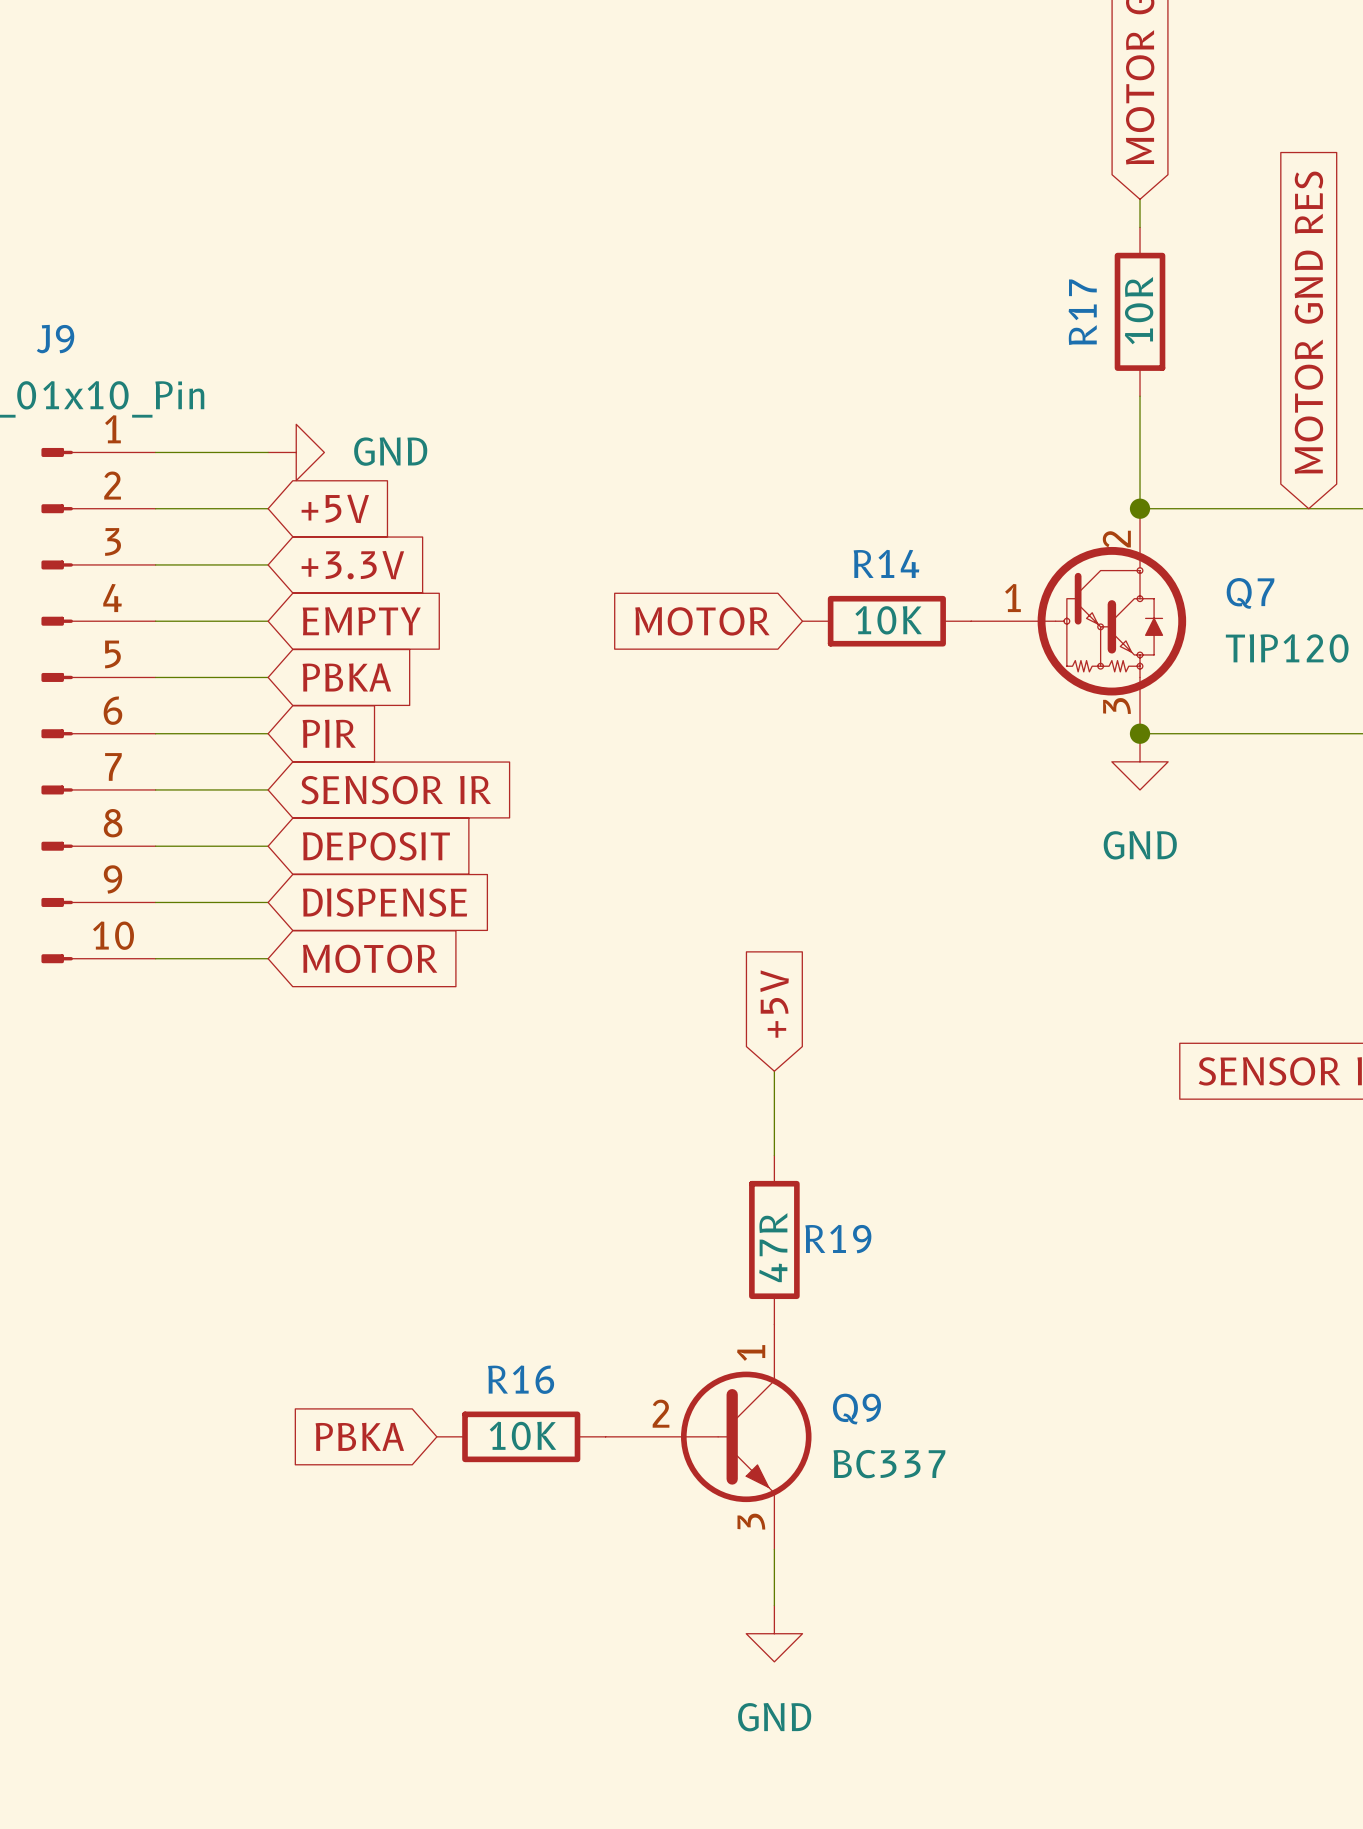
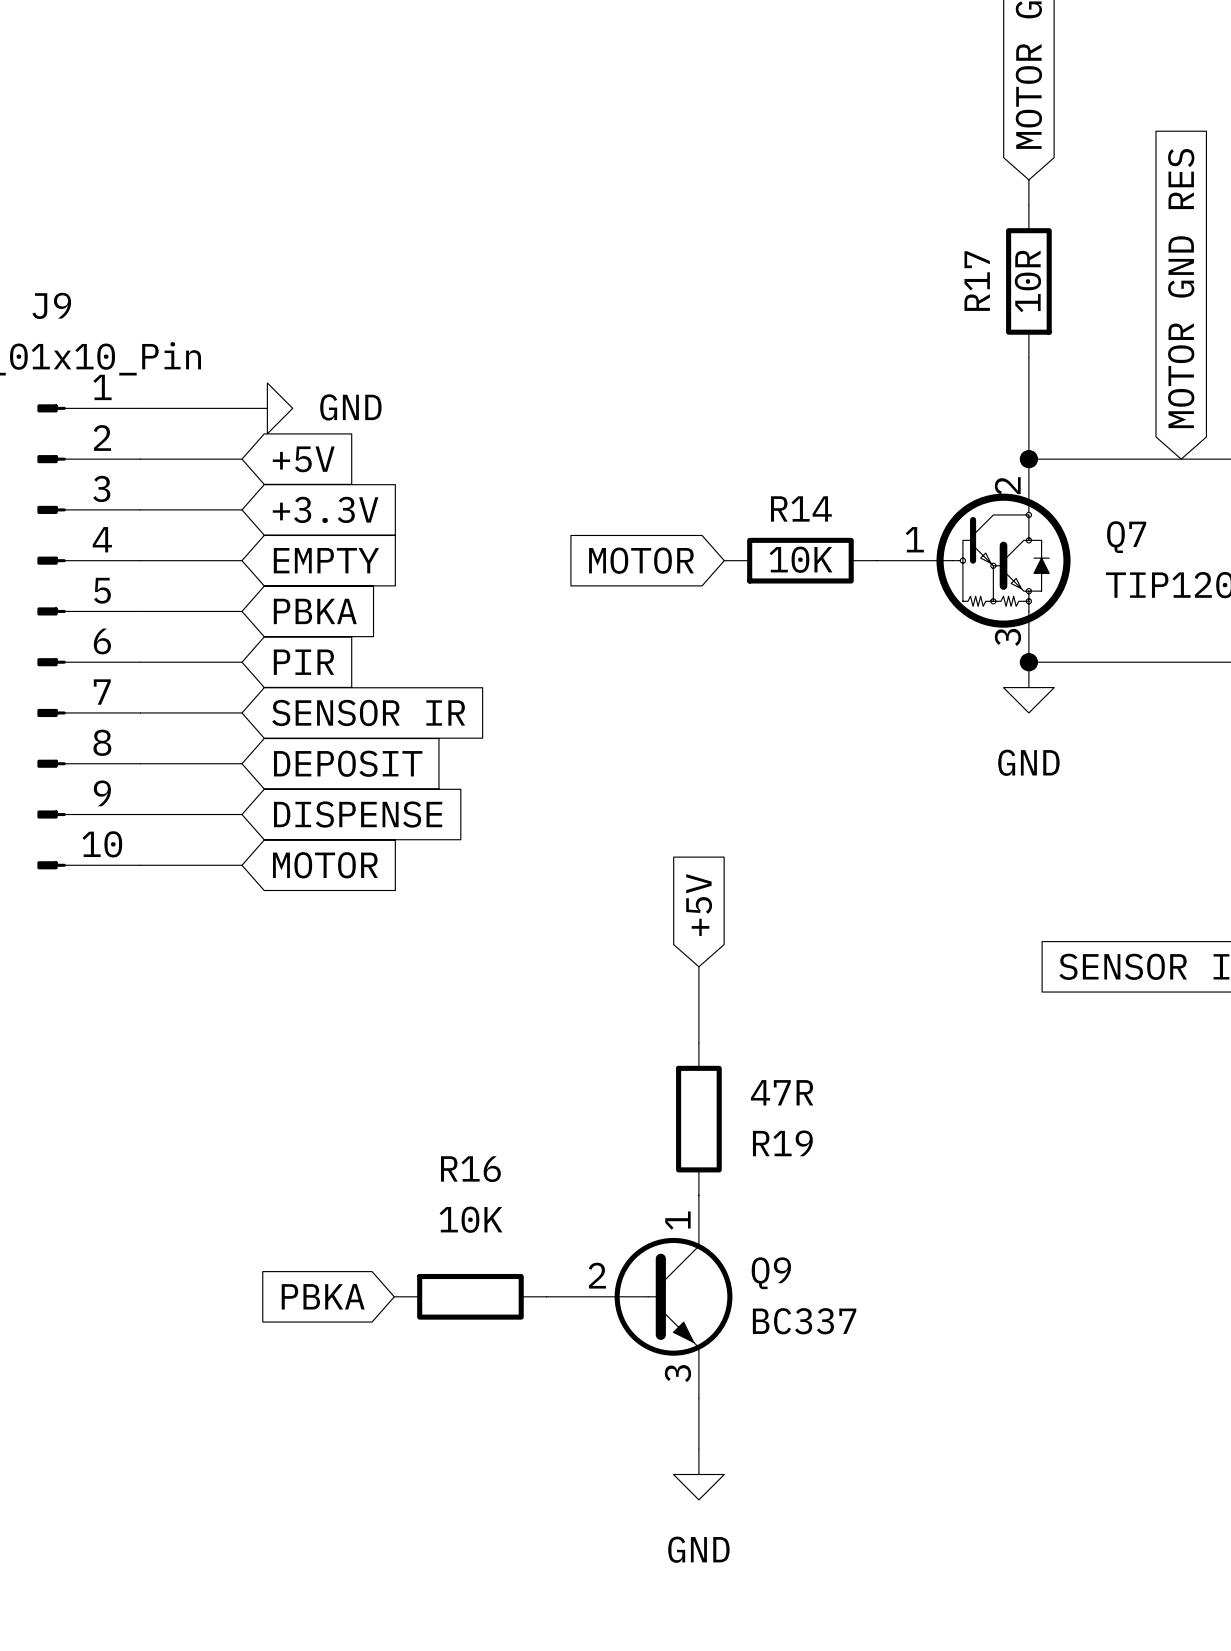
R19 name position: R19 (838, 1239) -> R19 (782, 1143)
R19 value rotation: 0° (773, 1247) -> 90° clockwise (782, 1092)
R19 value position: 47R (773, 1247) -> 47R (782, 1092)
R16 name position: R16 (521, 1379) -> R16 (470, 1169)
R16 value position: 10K (522, 1435) -> 10K (471, 1219)

